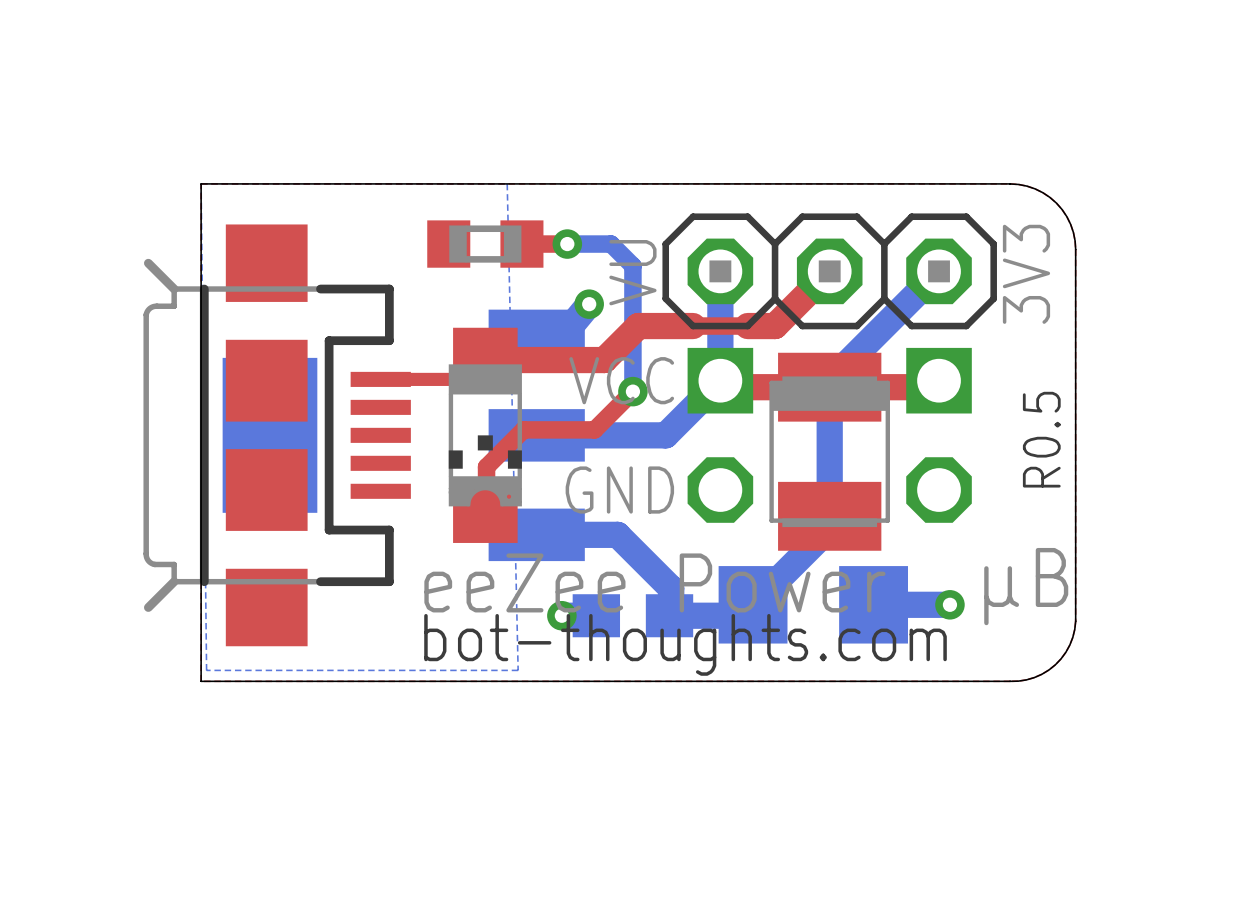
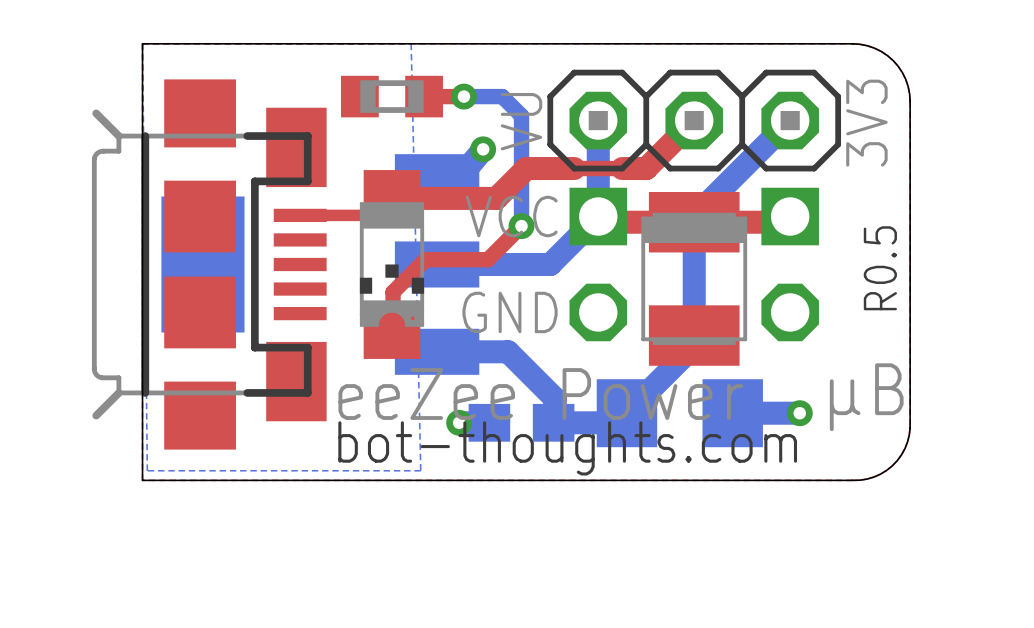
part footprint: [143, 224, 411, 647] -> [91, 79, 327, 450]

